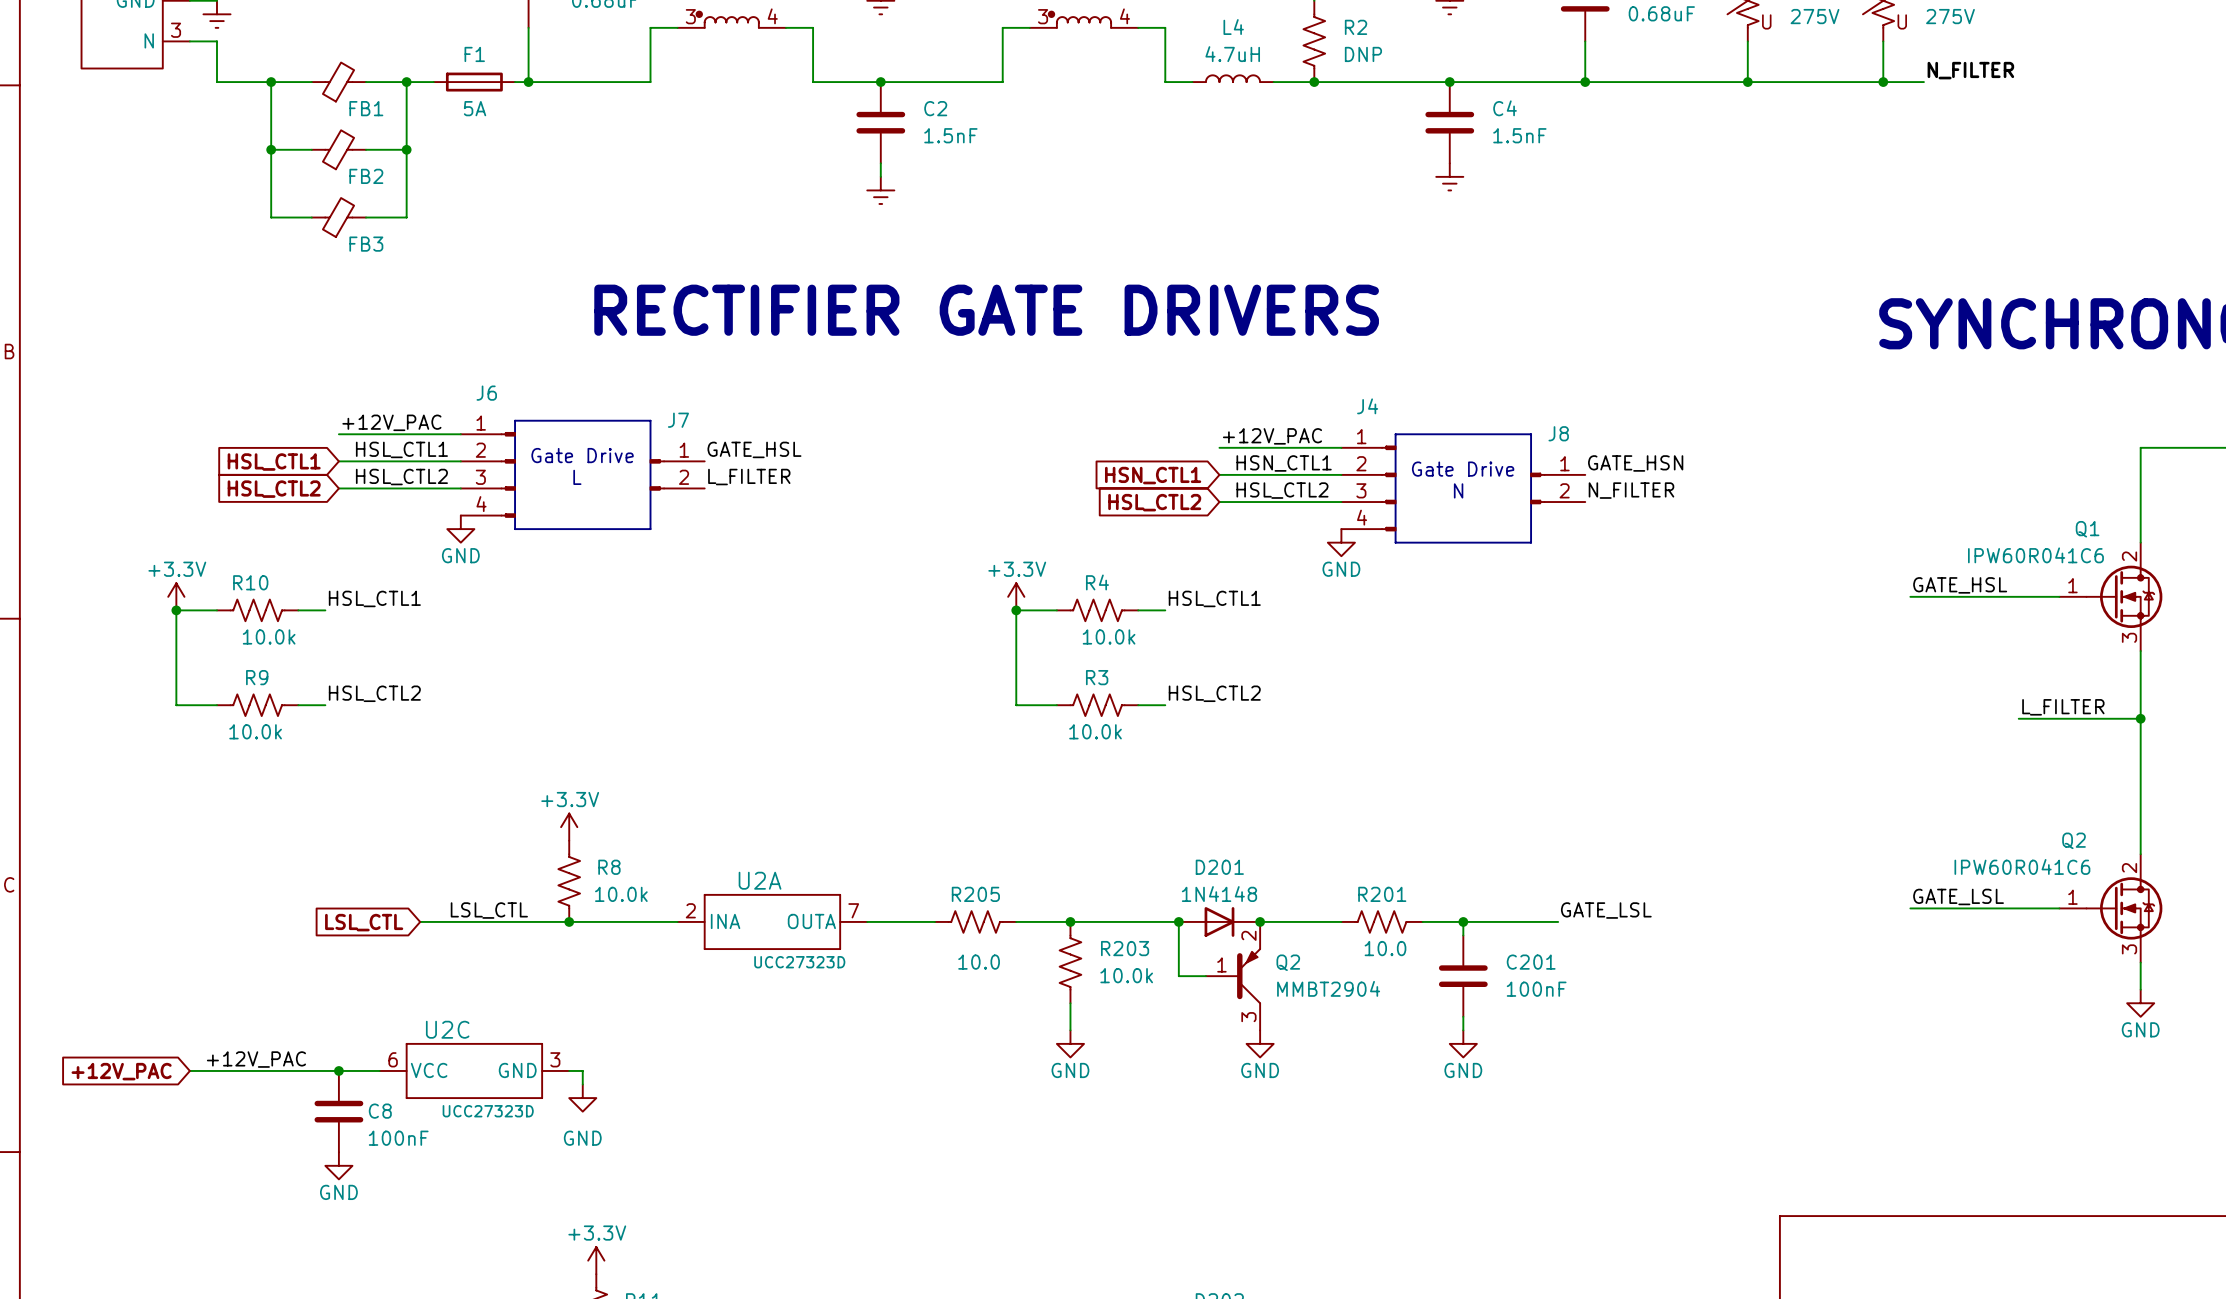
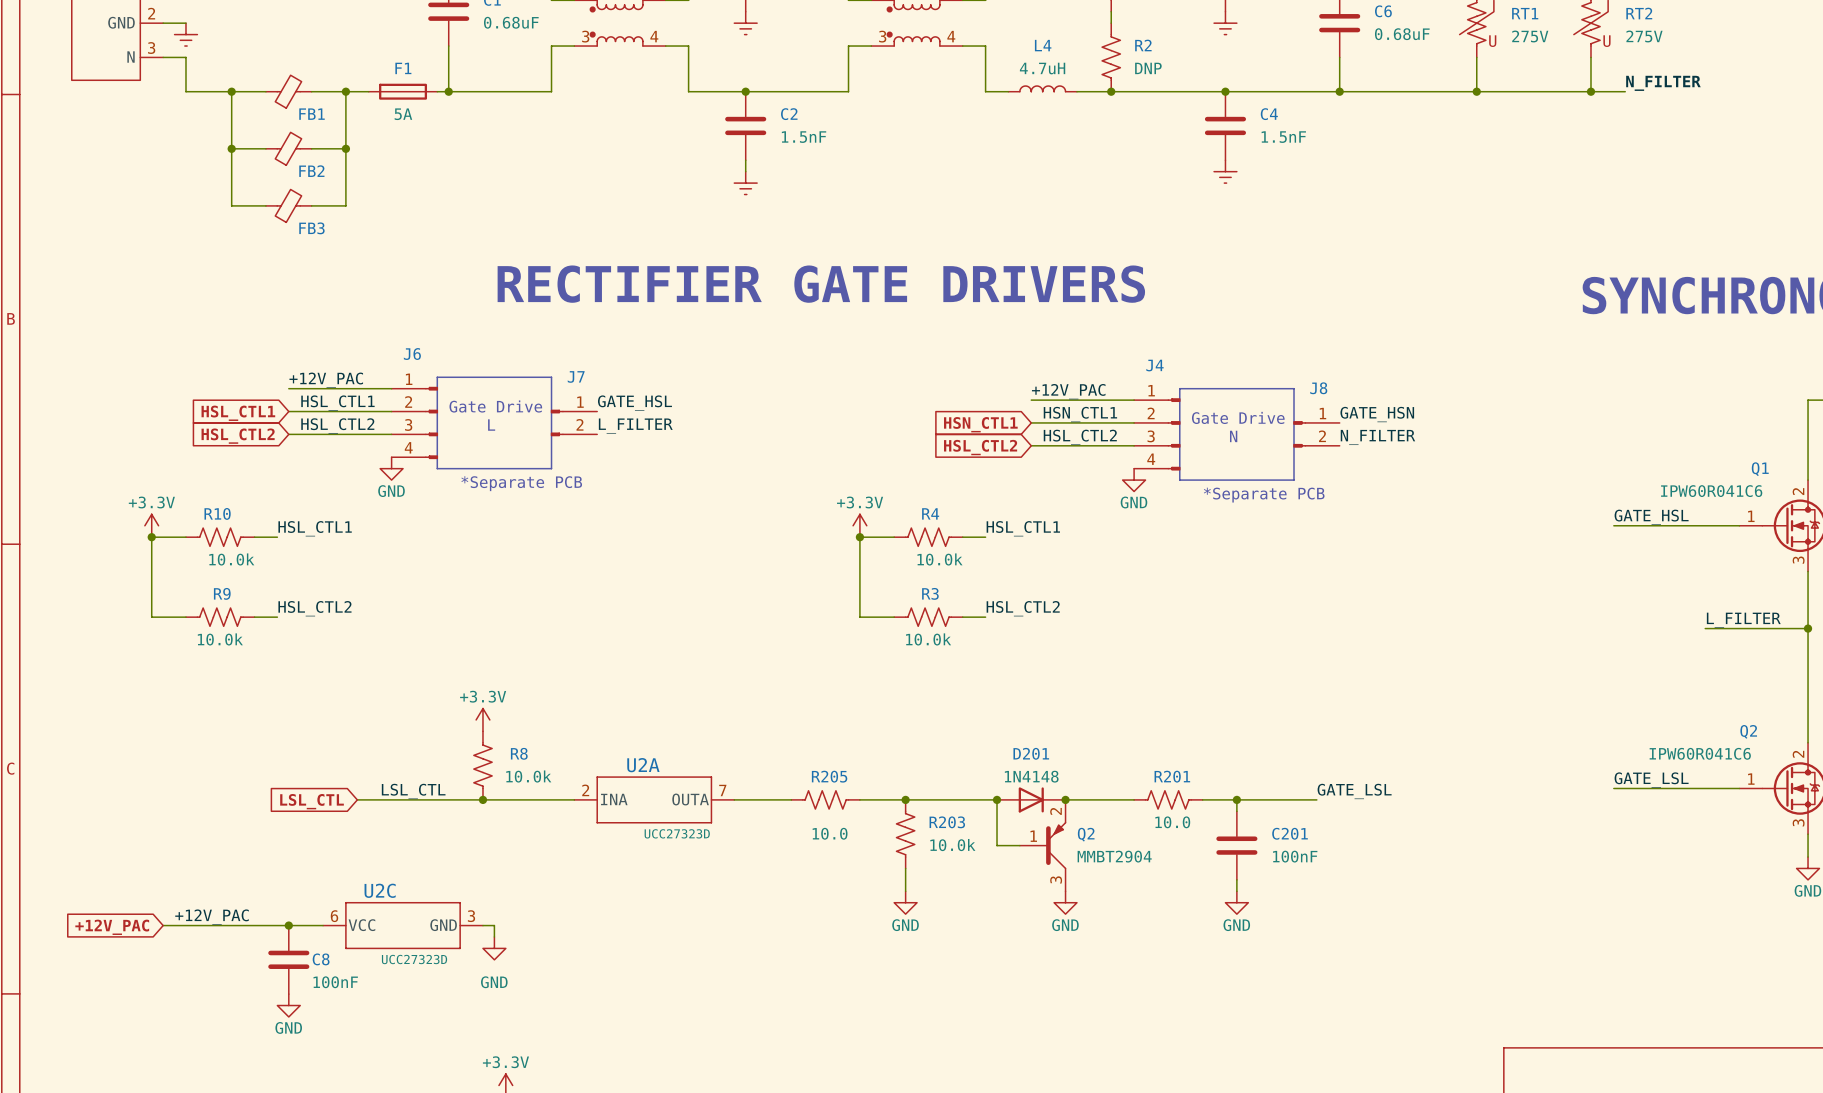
text: none -> *Separate PCB (521, 483)
text: none -> *Separate PCB (1264, 495)

